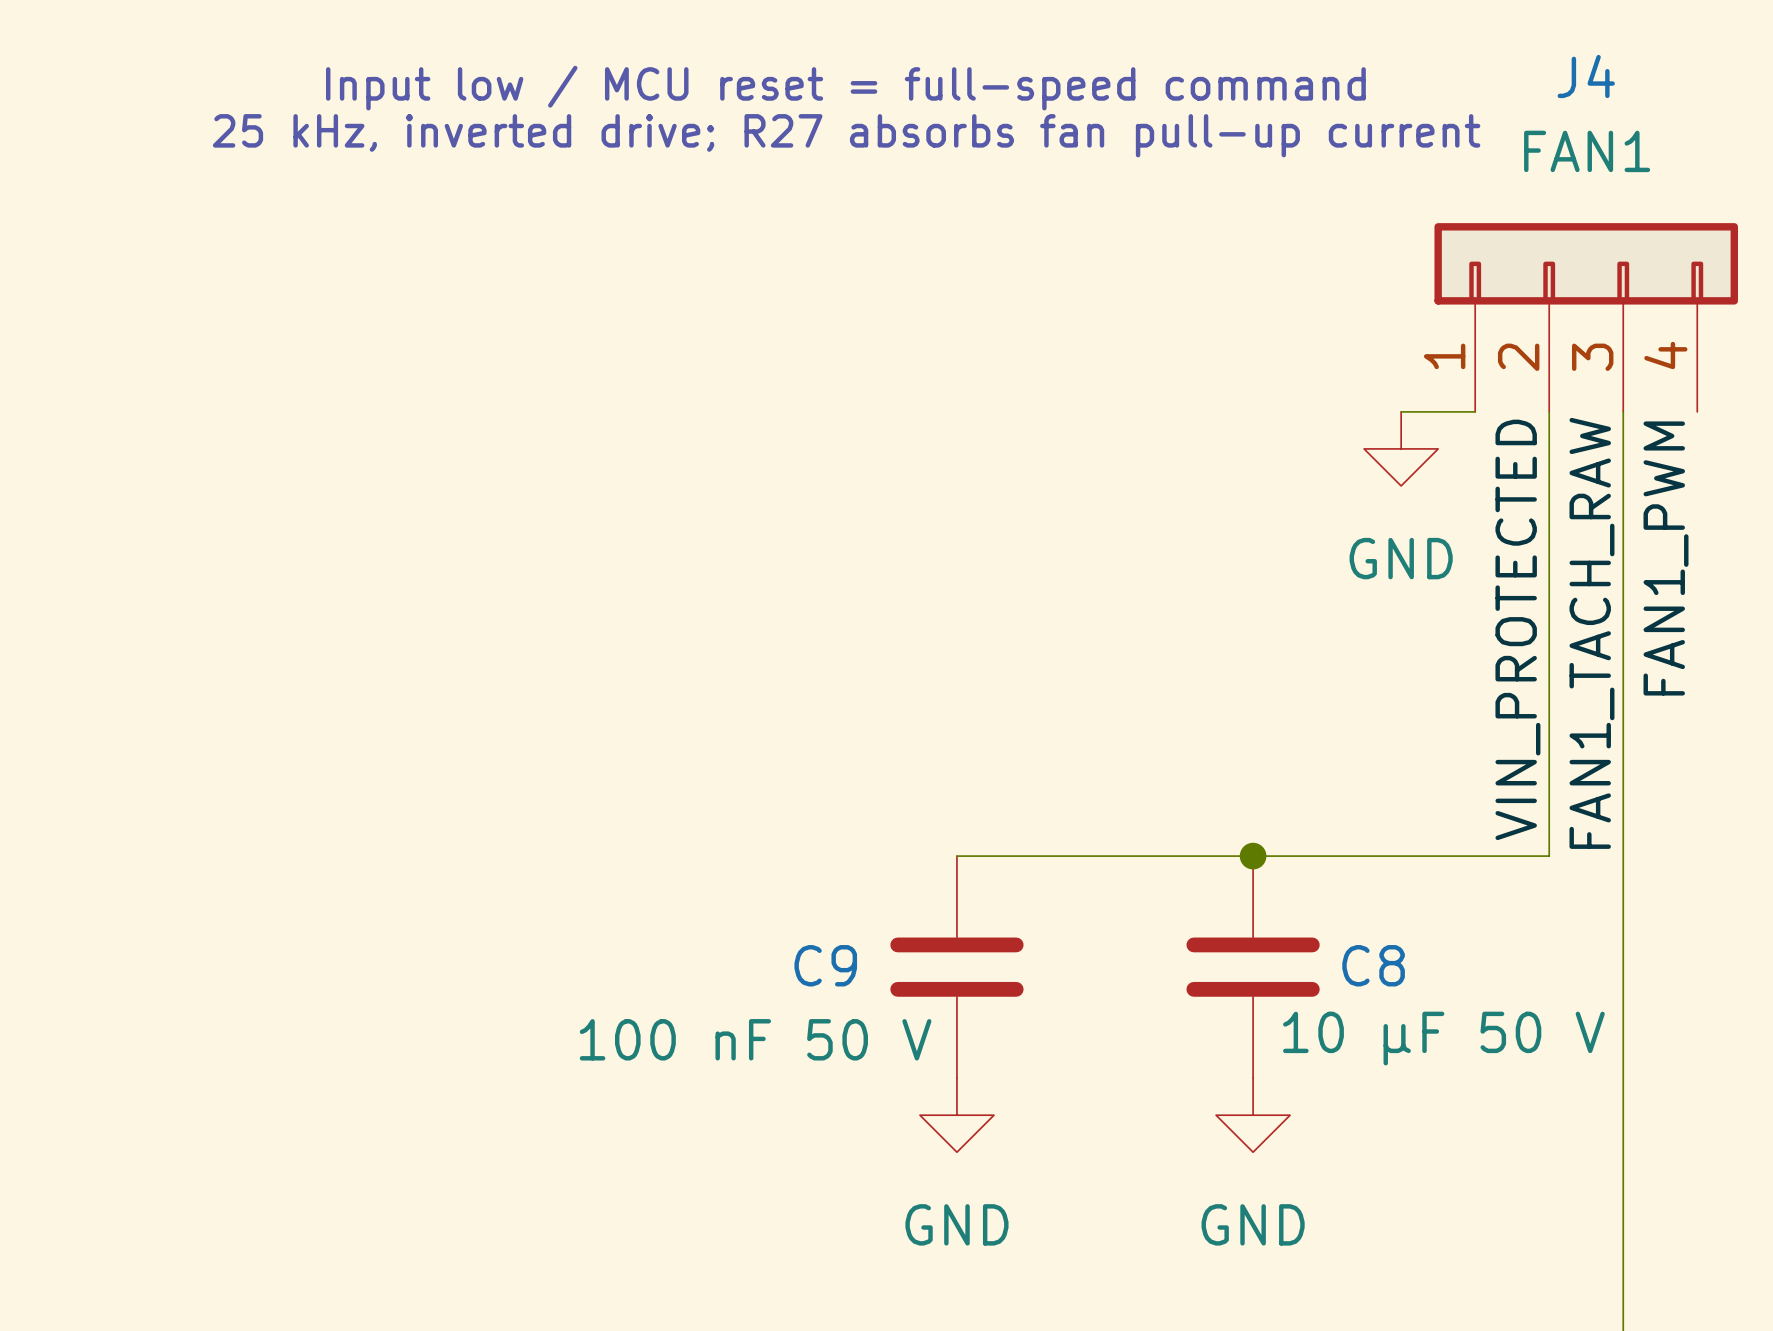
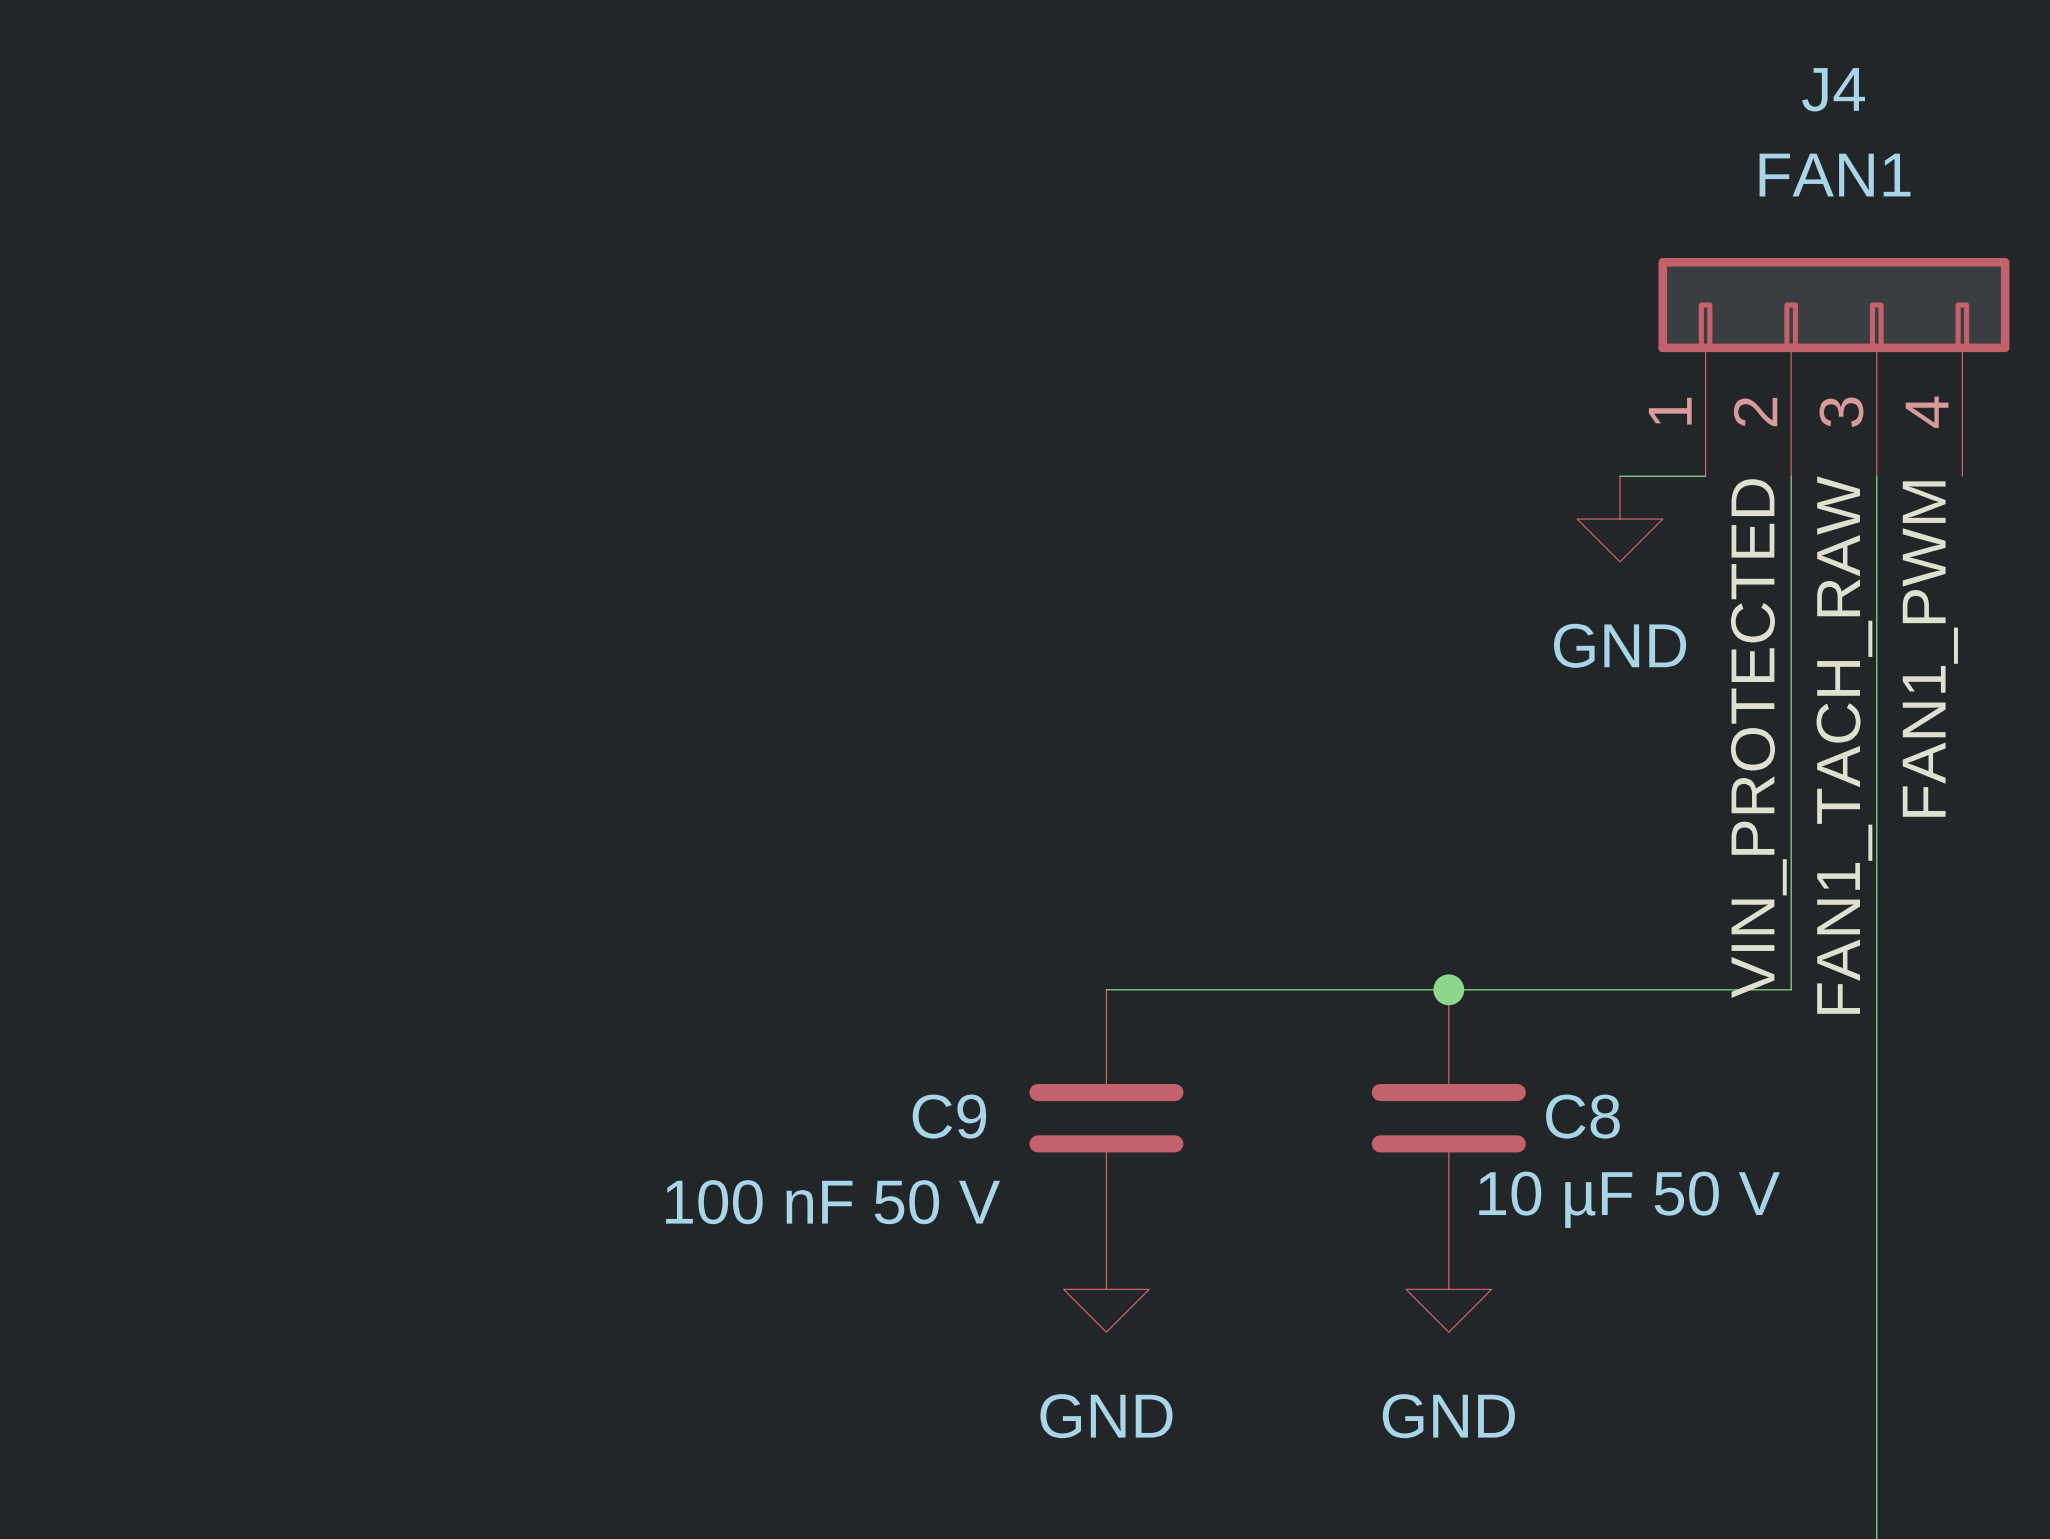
text: Input low / MCU reset = full-speed command (845, 88) -> none
text: 25 kHz, inverted drive; R27 absorbs fan pull-up current (846, 135) -> none

